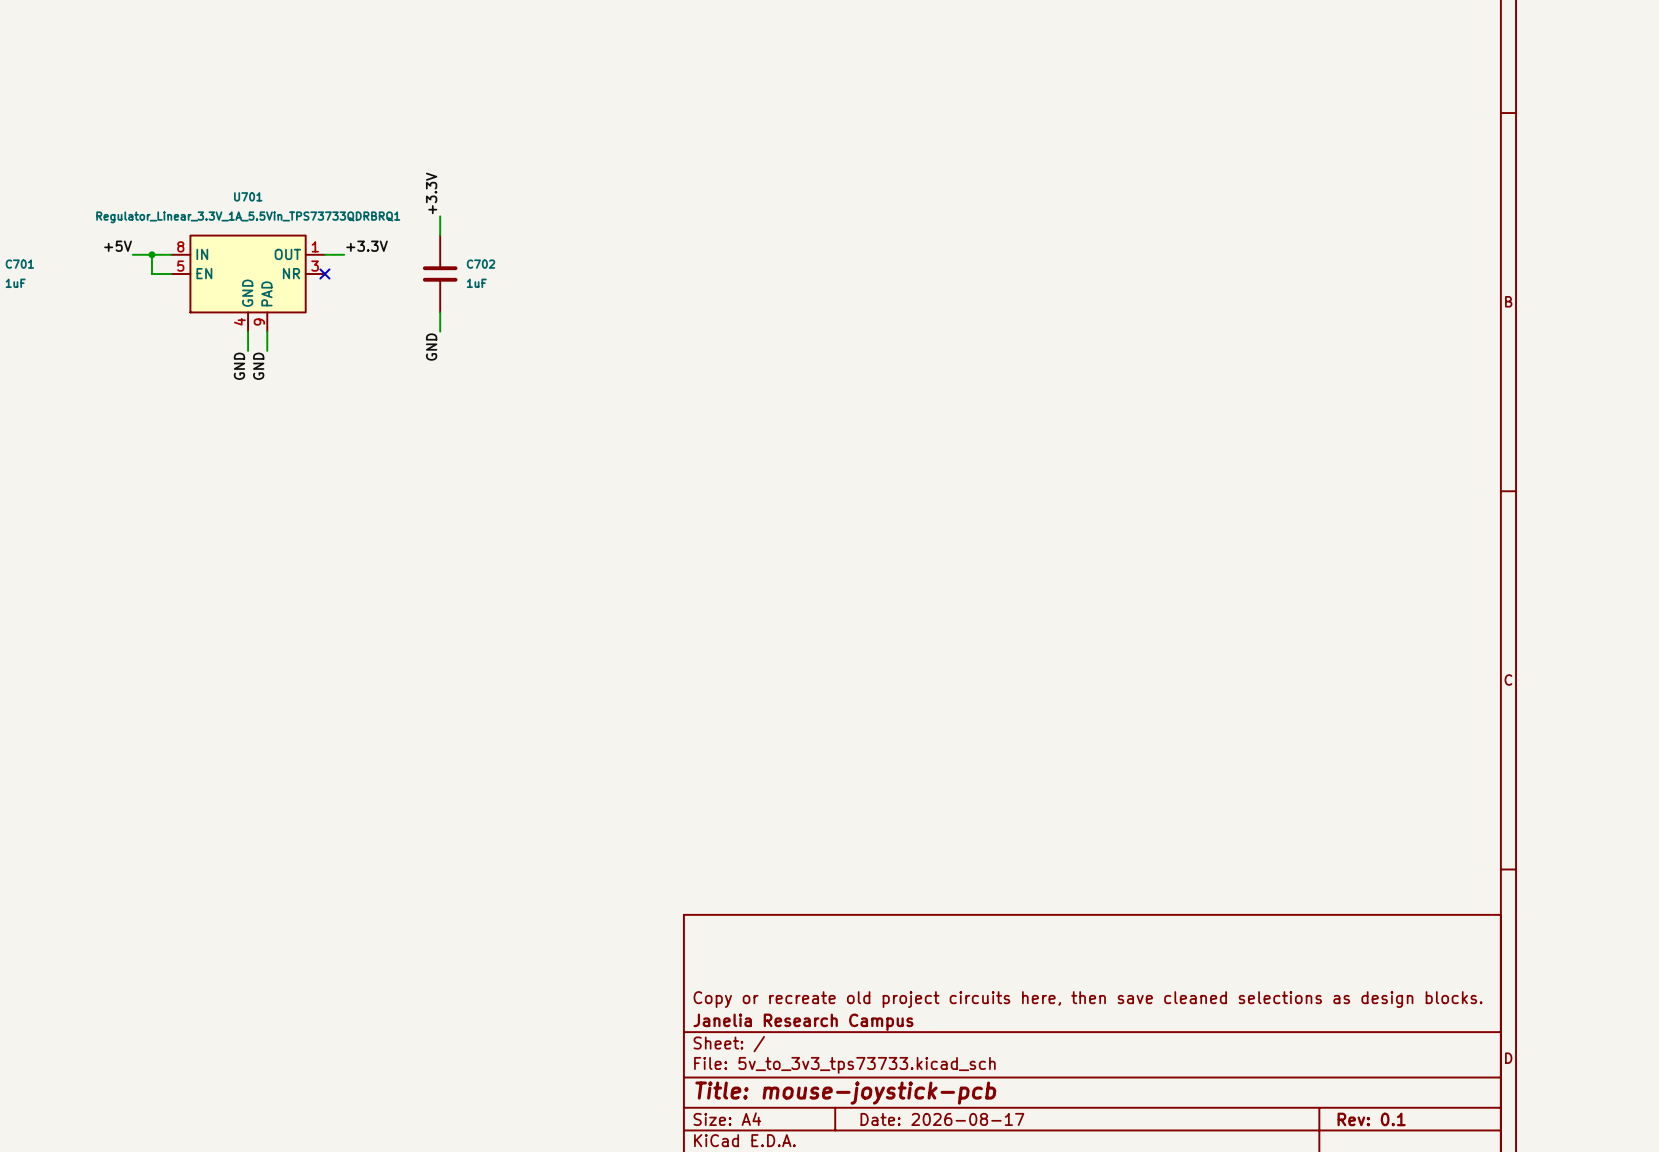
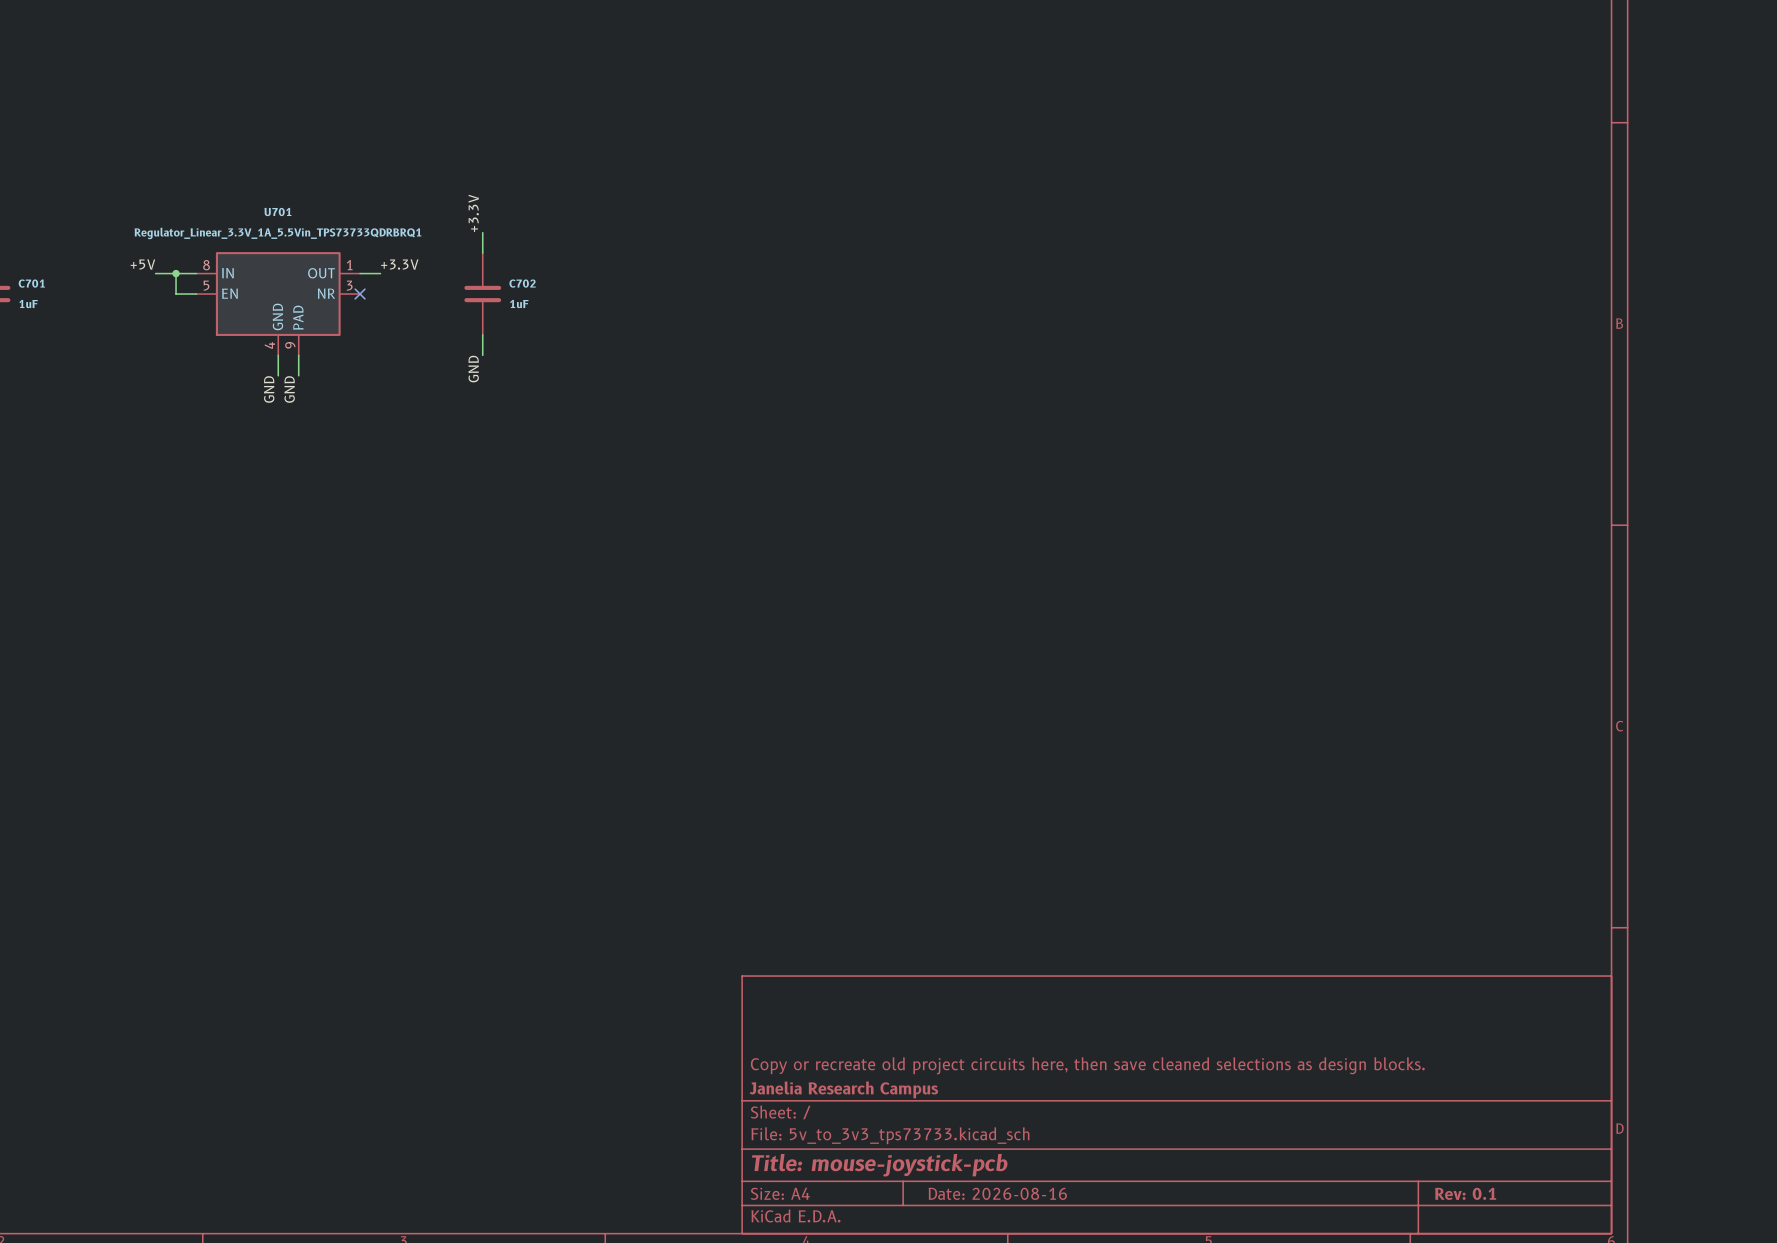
title block: Date: 2026-08-17 (942, 1119) -> Date: 2026-08-16 (997, 1193)

